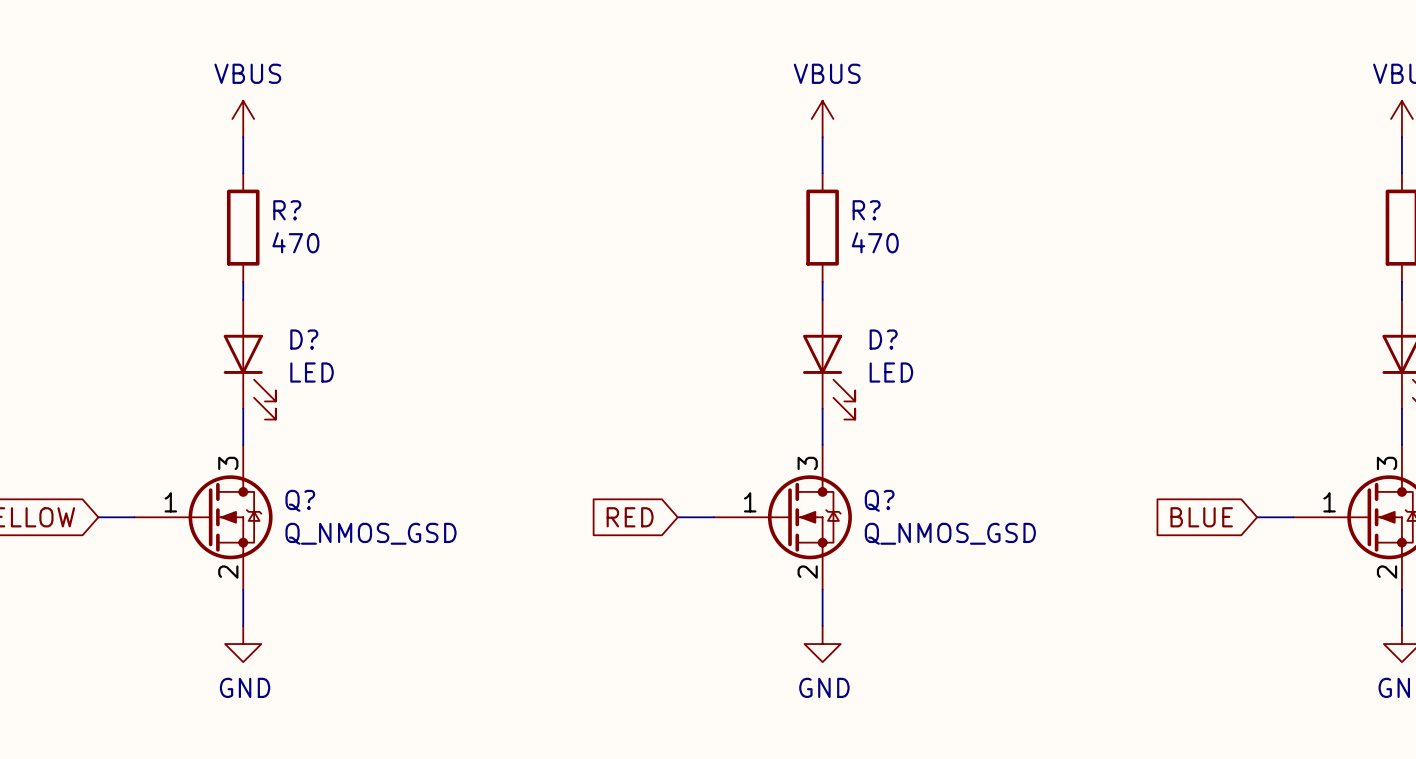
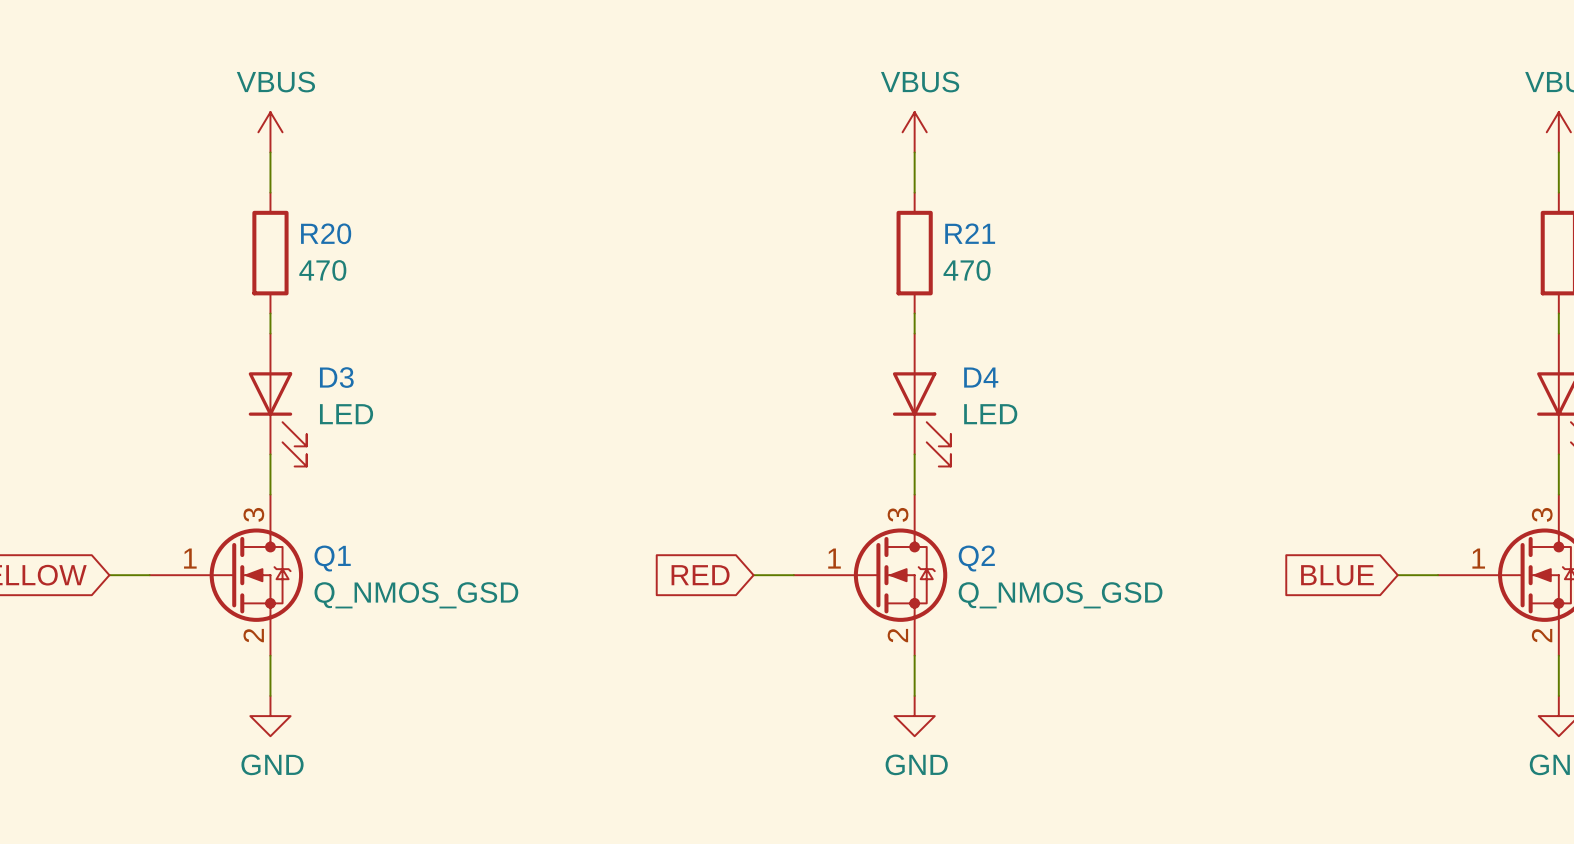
R? name: R? (287, 210) -> R20 (326, 233)
R? name: R? (866, 210) -> R21 (970, 233)
D? name: D? (304, 339) -> D3 (336, 377)
D? name: D? (883, 339) -> D4 (981, 377)
Q? name: Q? (300, 500) -> Q1 (332, 558)
Q? name: Q? (879, 500) -> Q2 (976, 558)

